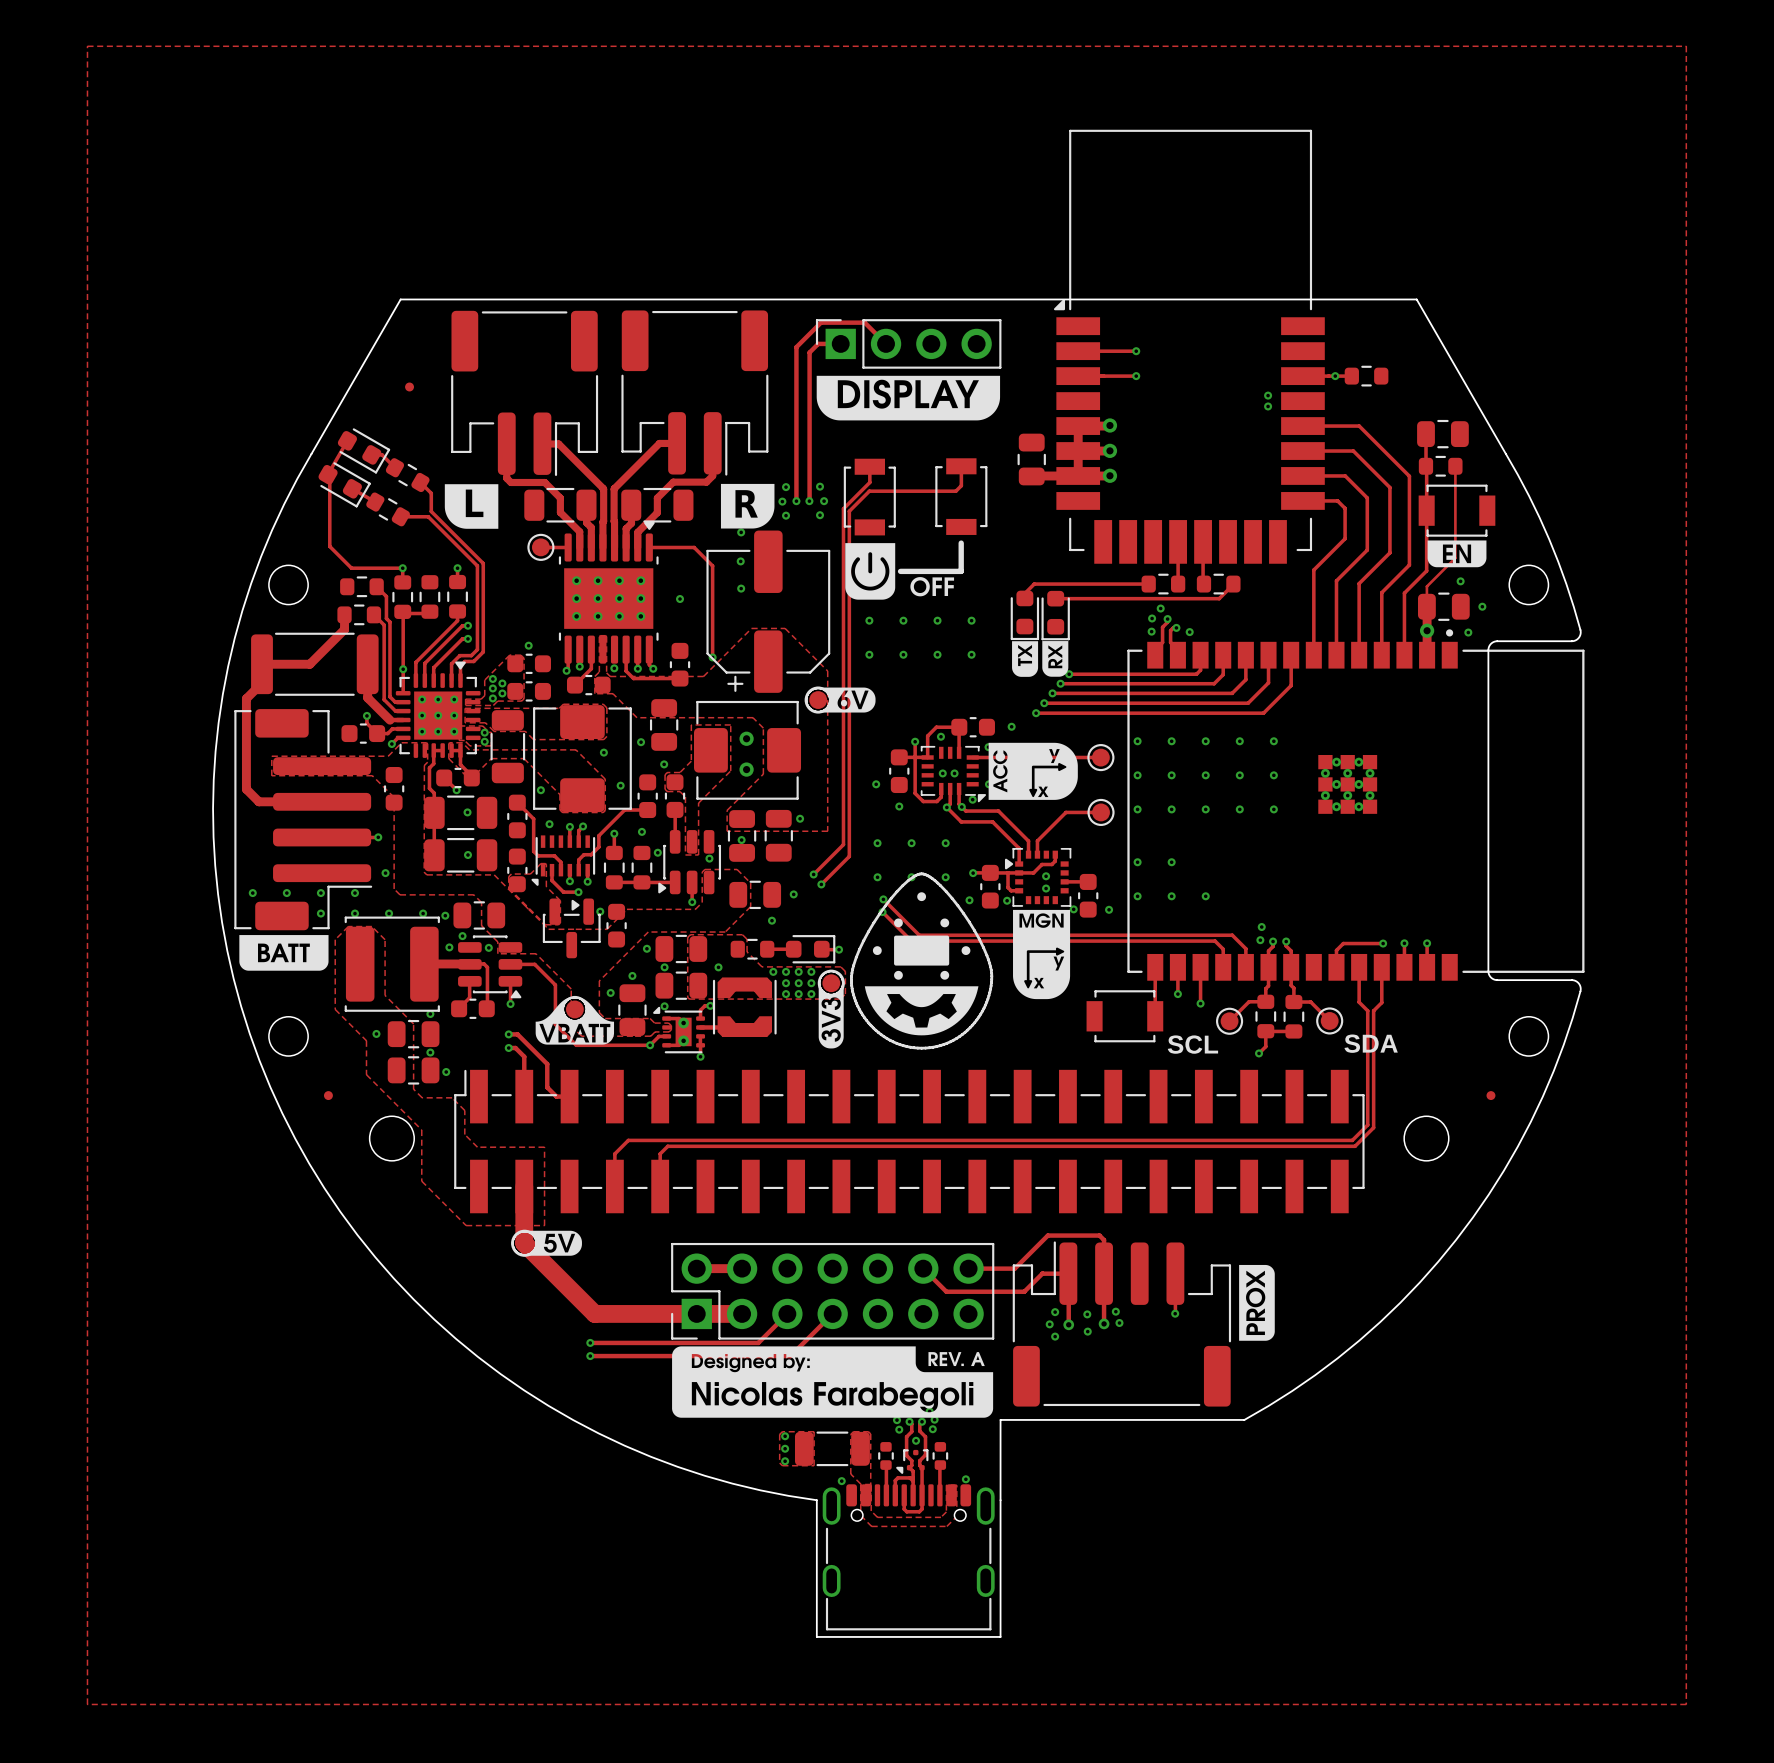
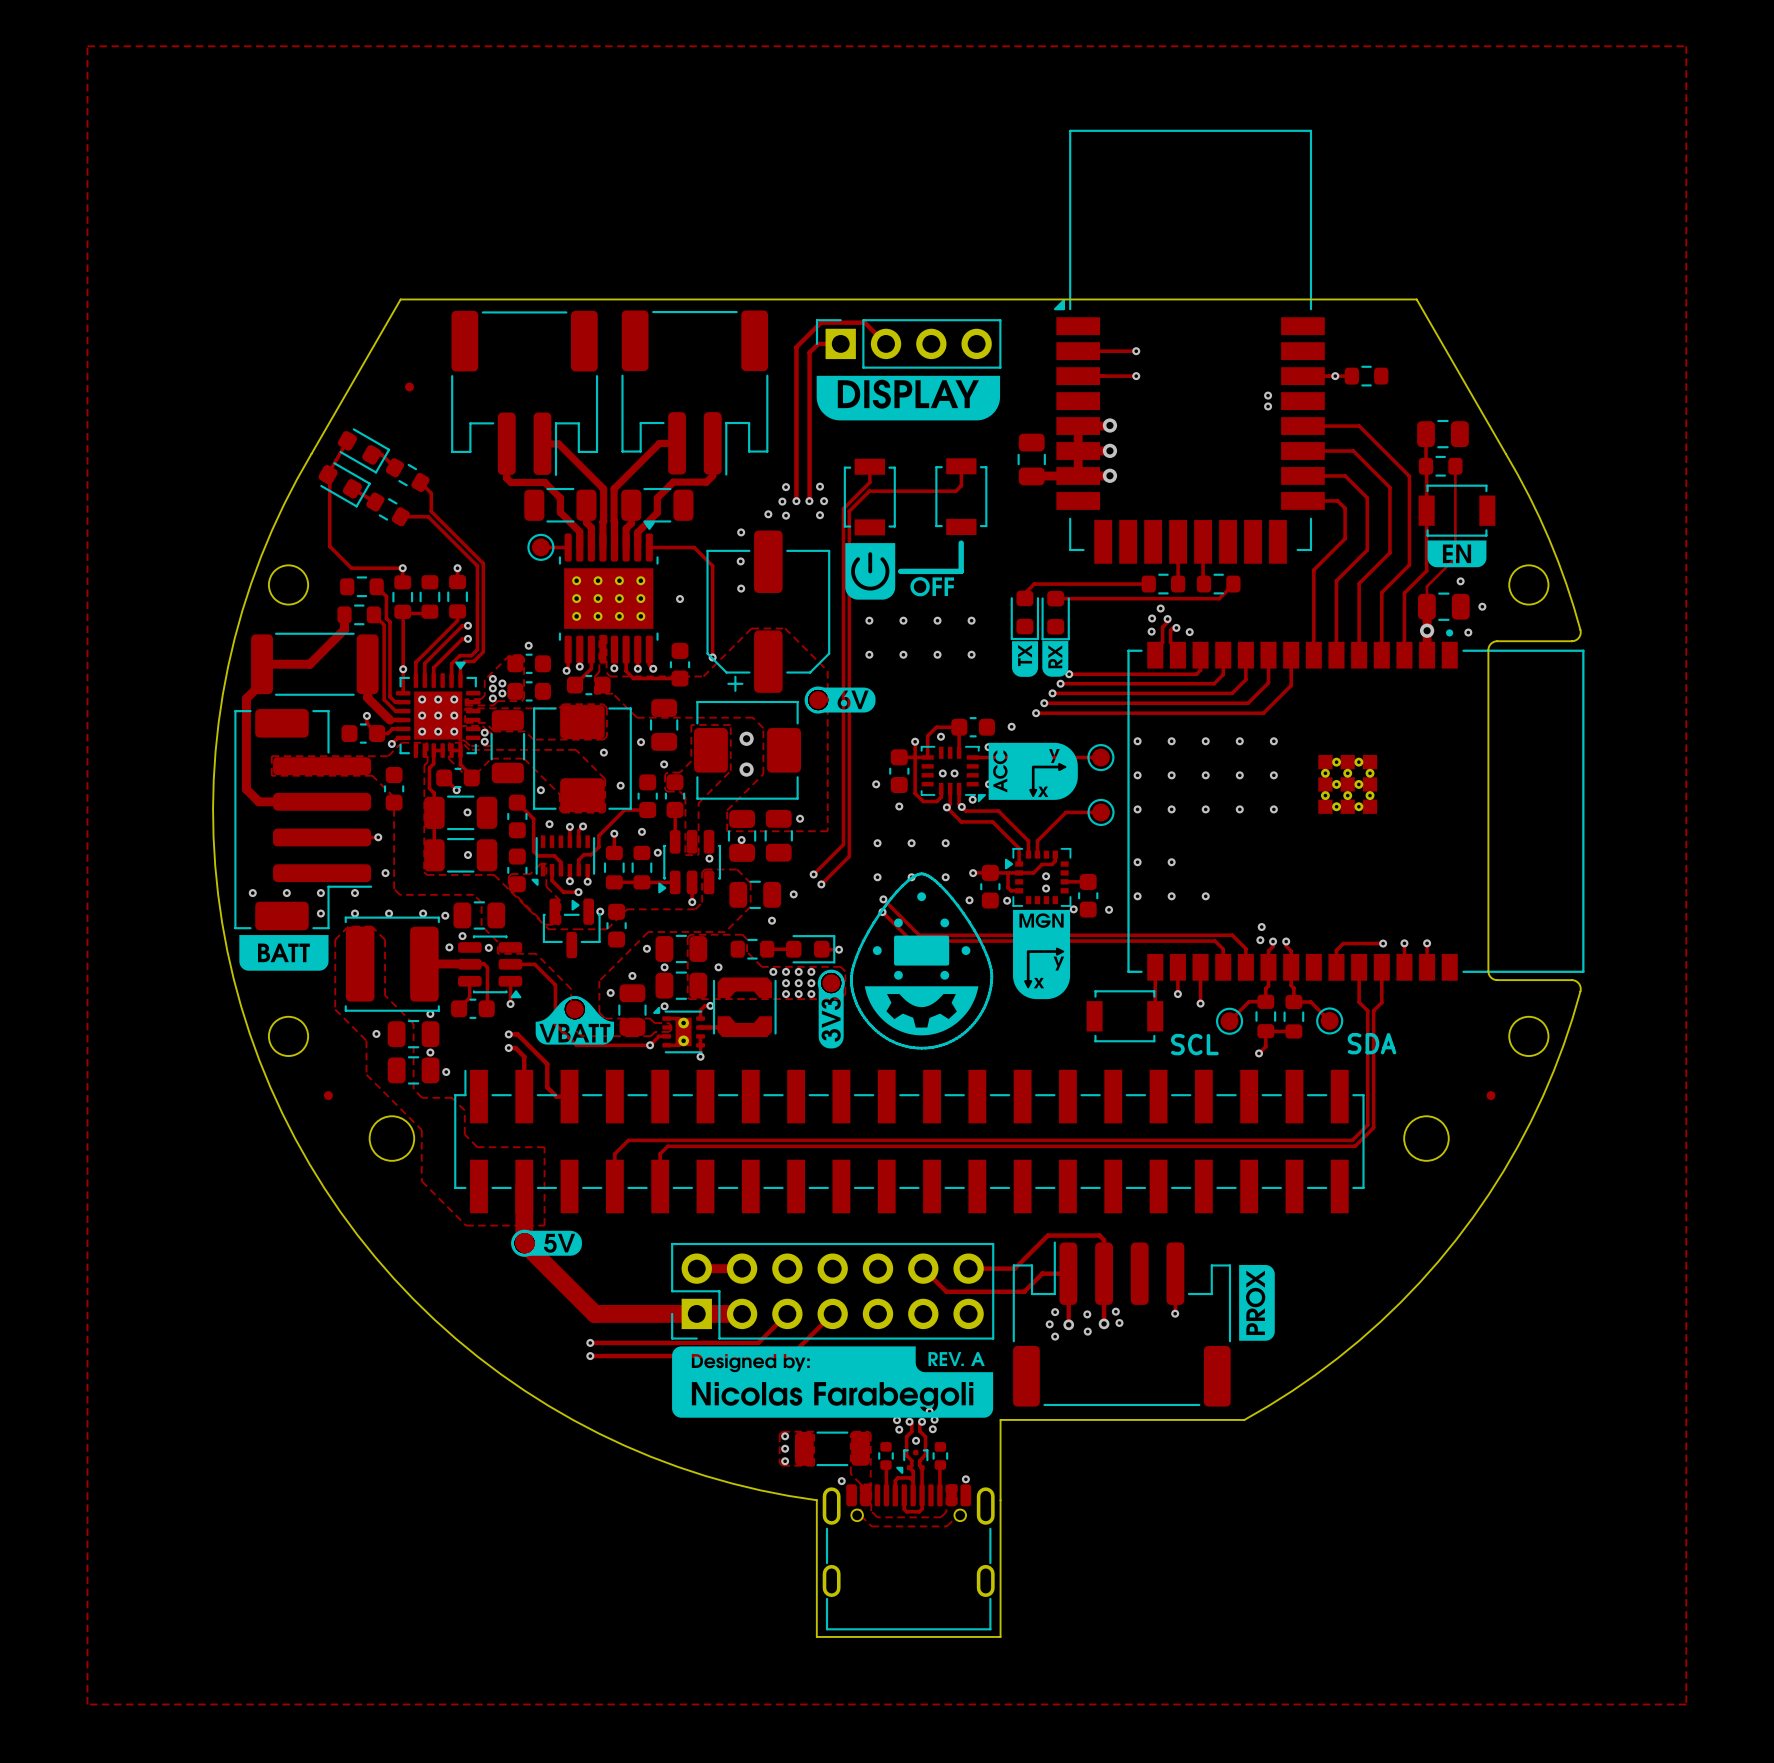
drawing: [720, 483, 775, 529] -> none
drawing: [444, 484, 499, 529] -> none

